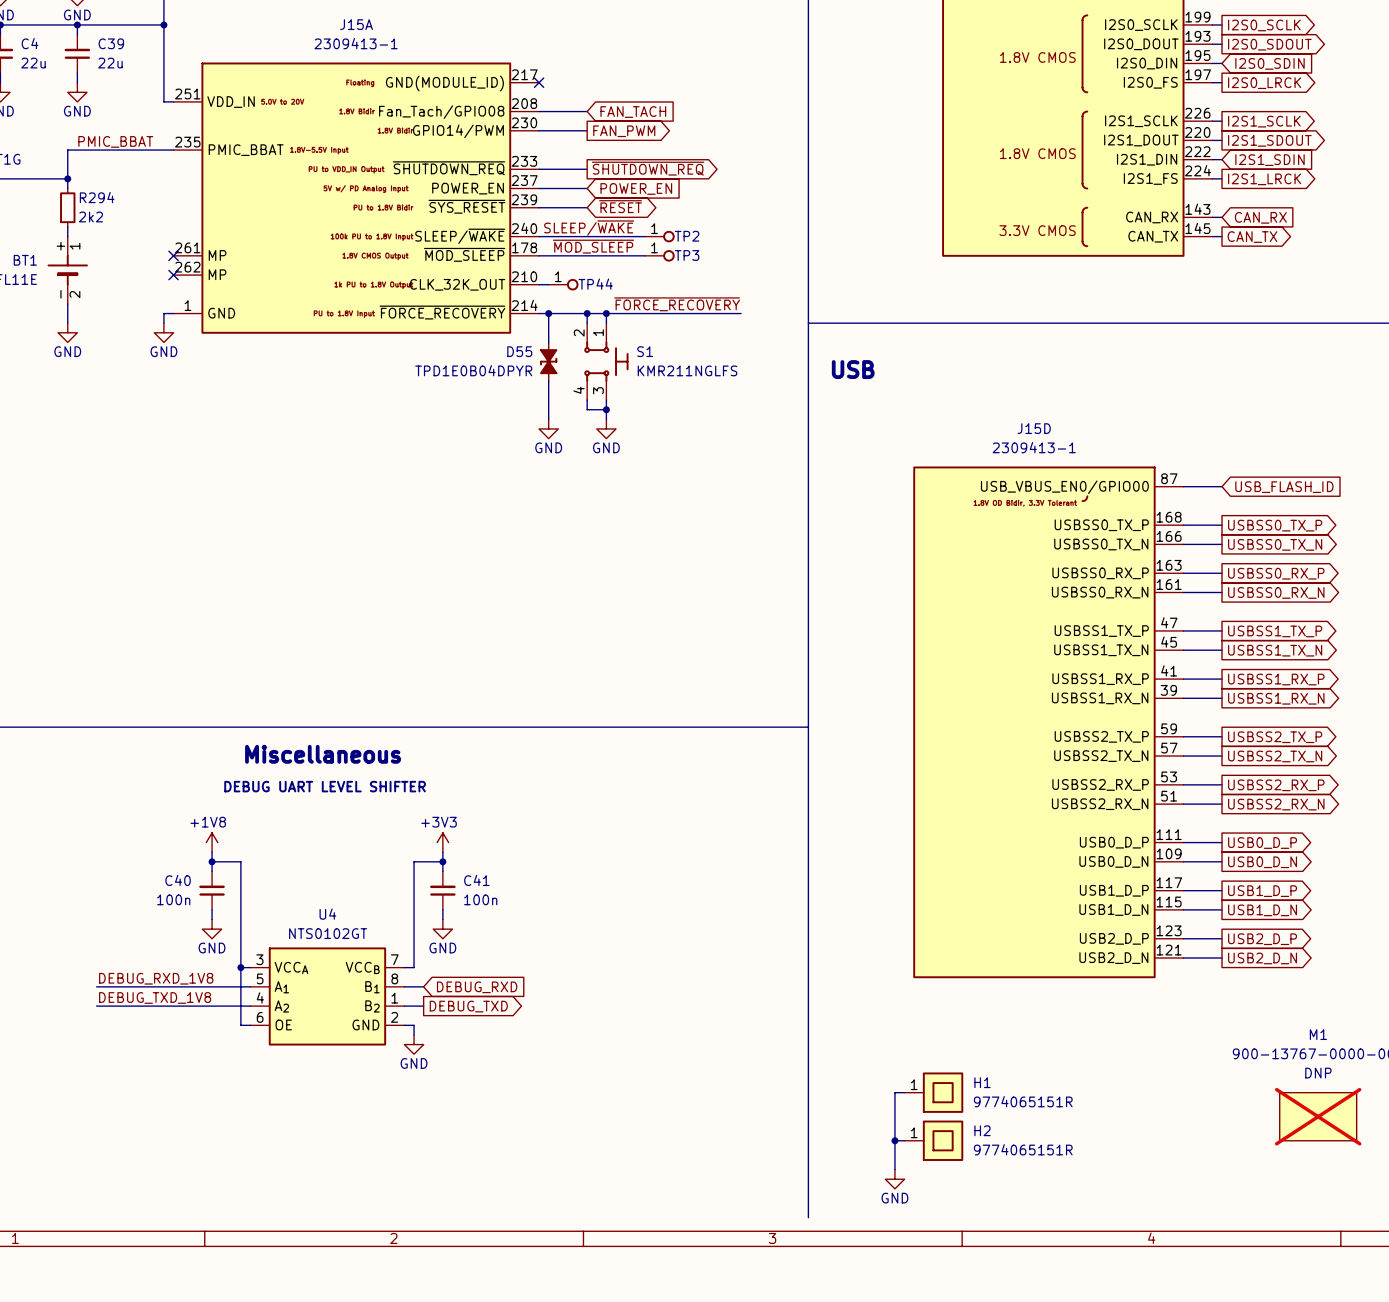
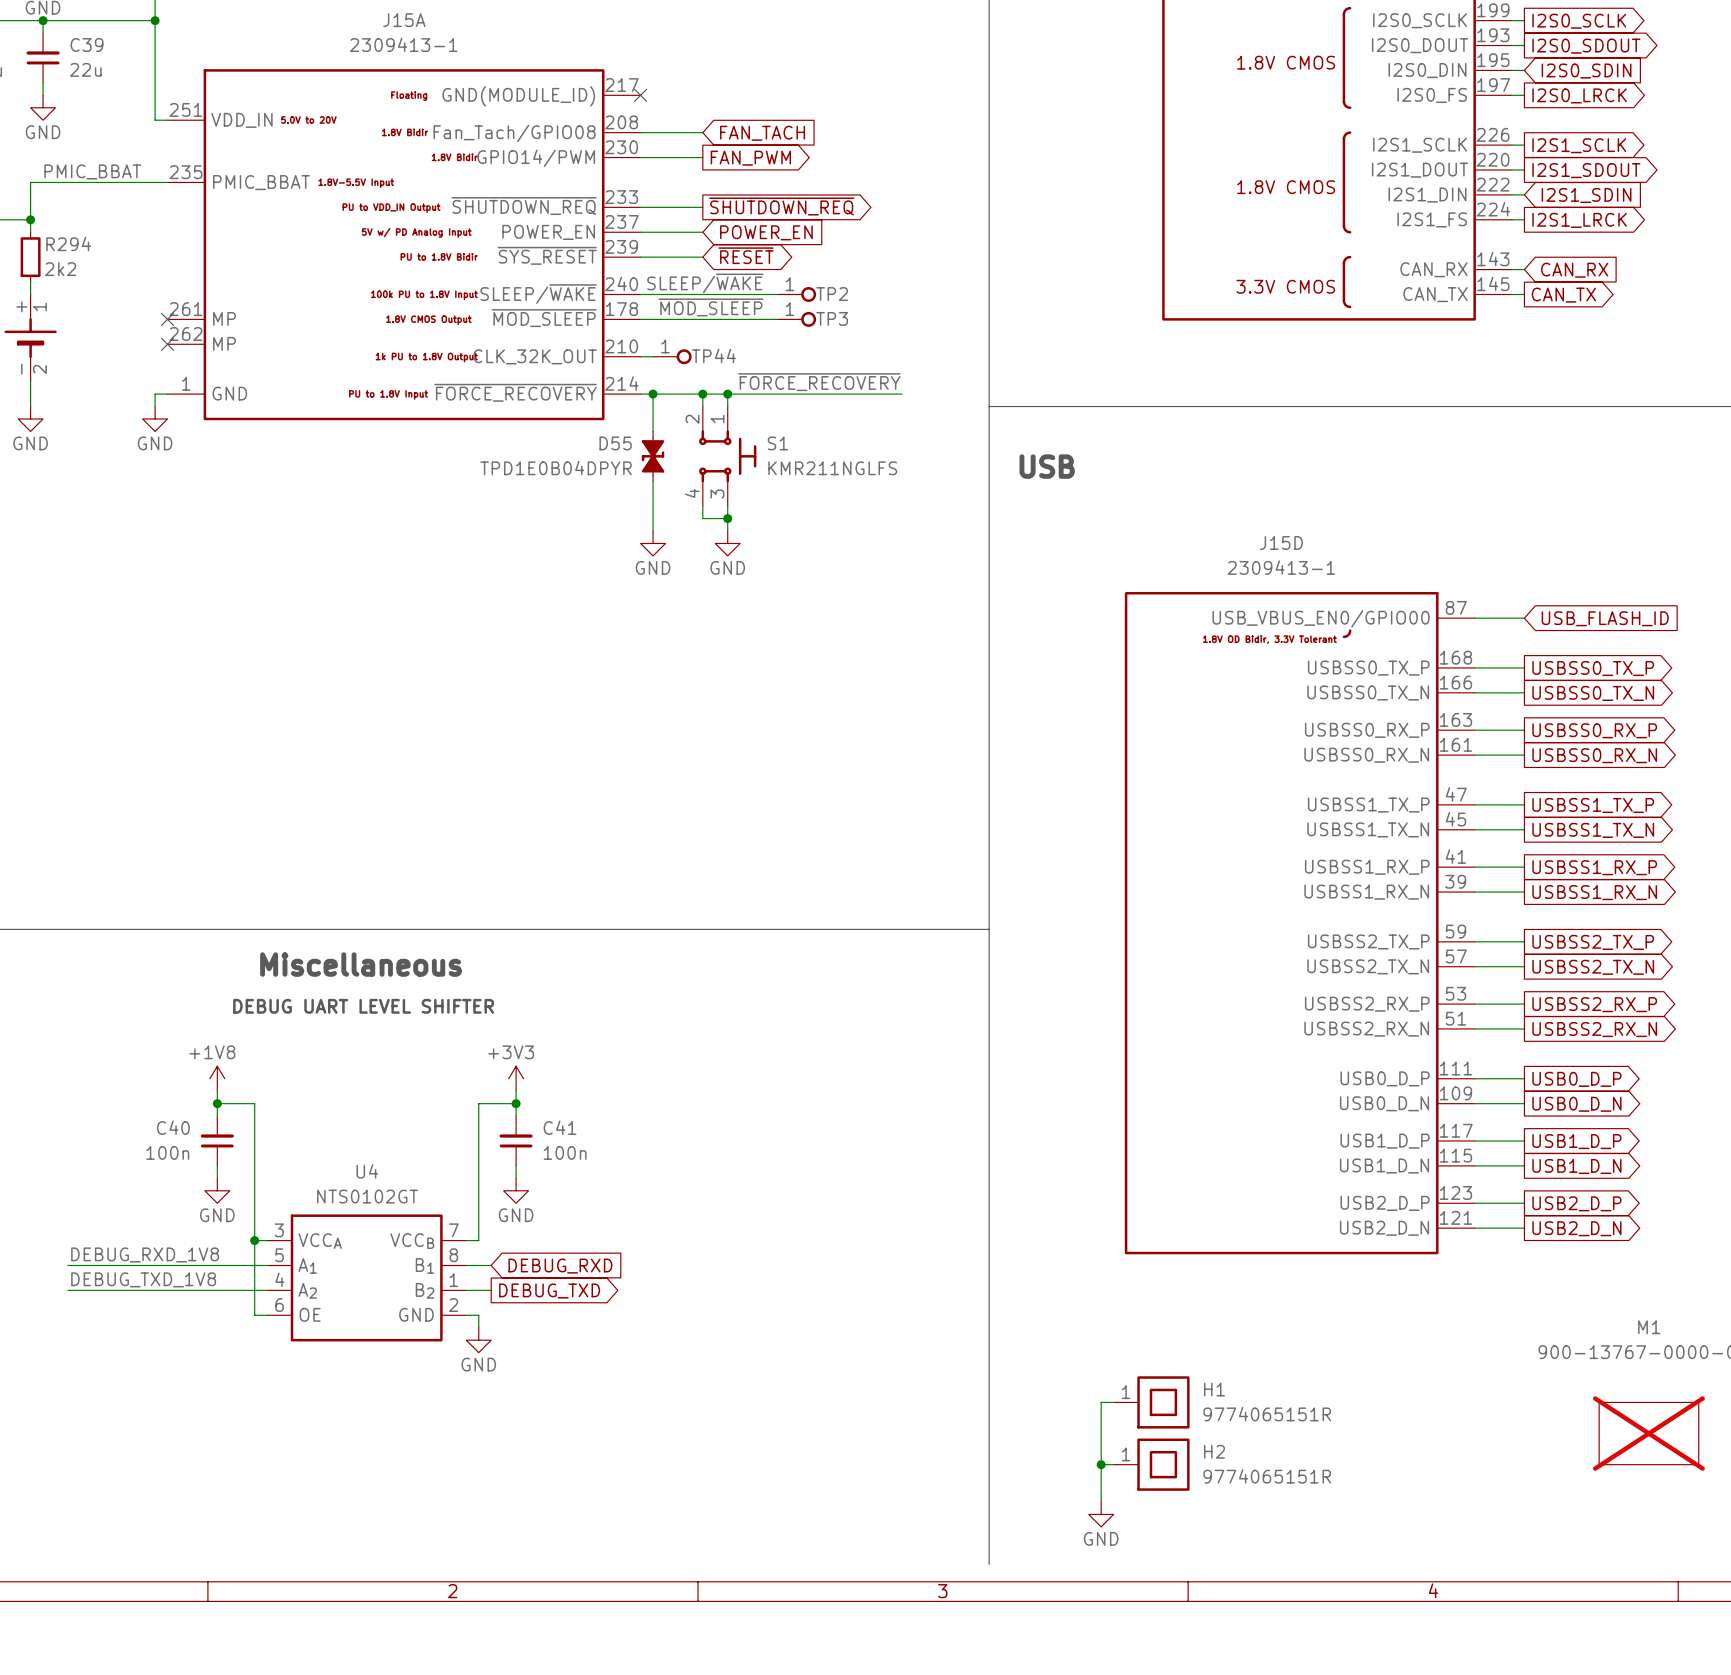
M1 text: DNP (1318, 1073) -> none

